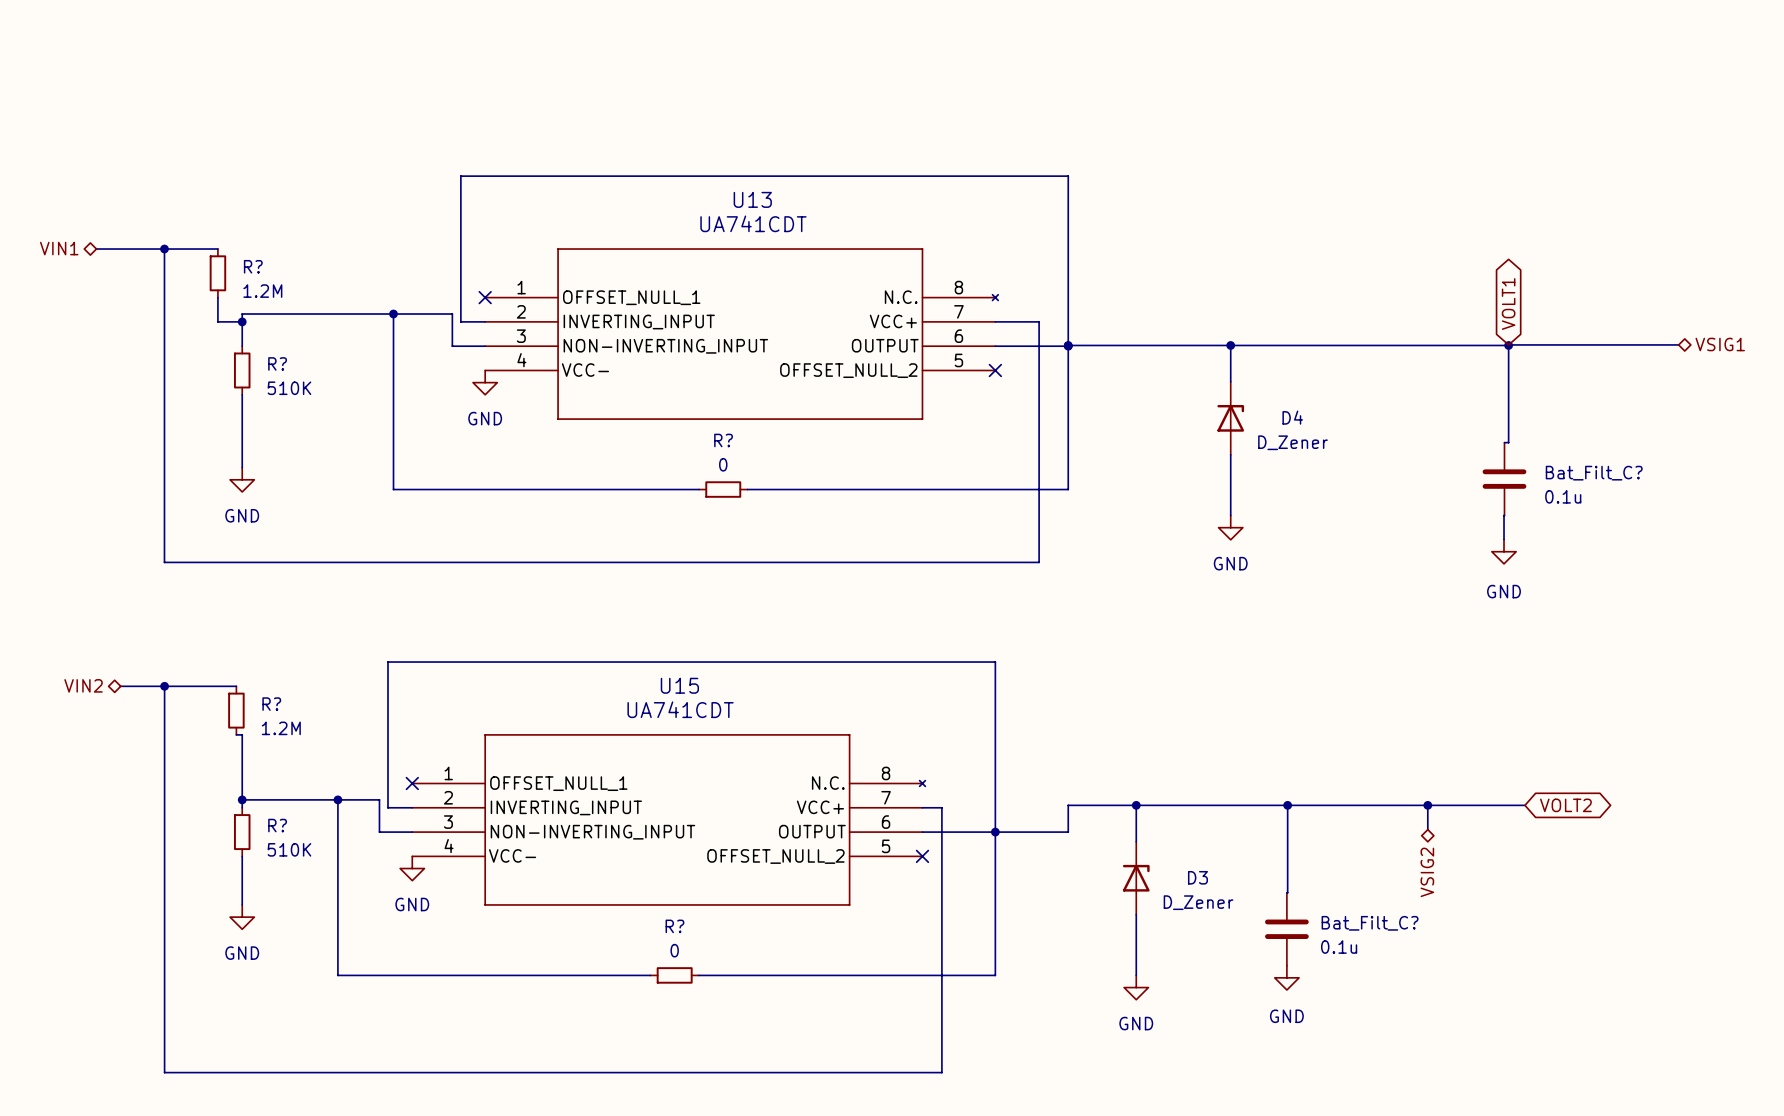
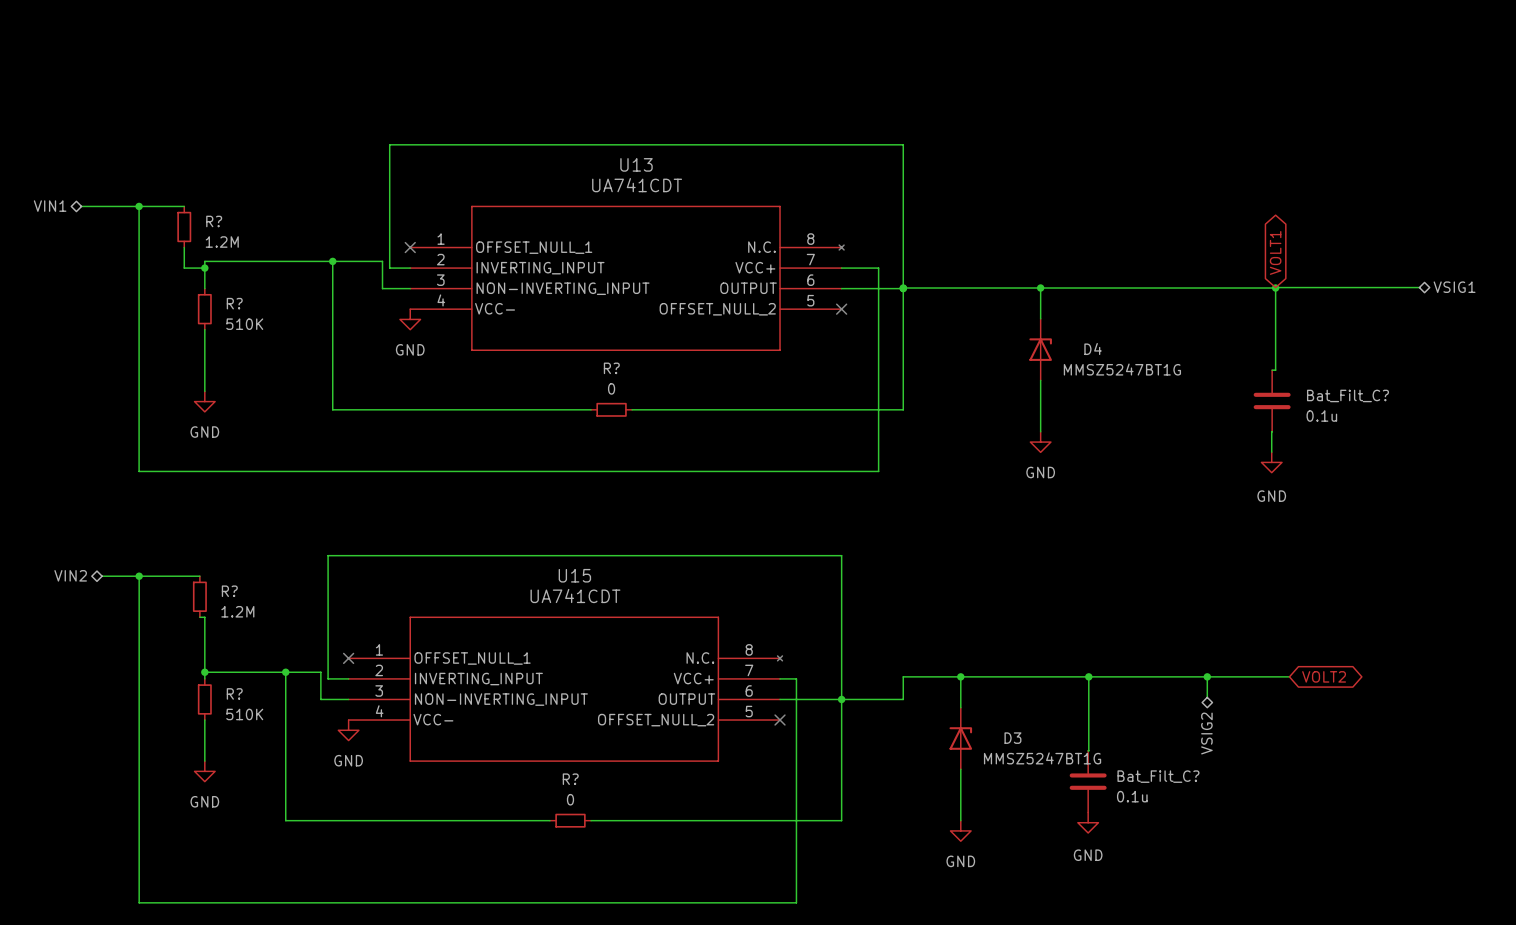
D4 value: D_Zener (1292, 442) -> MMSZ5247BT1G (1122, 369)
D3 value: D_Zener (1198, 902) -> MMSZ5247BT1G (1042, 758)

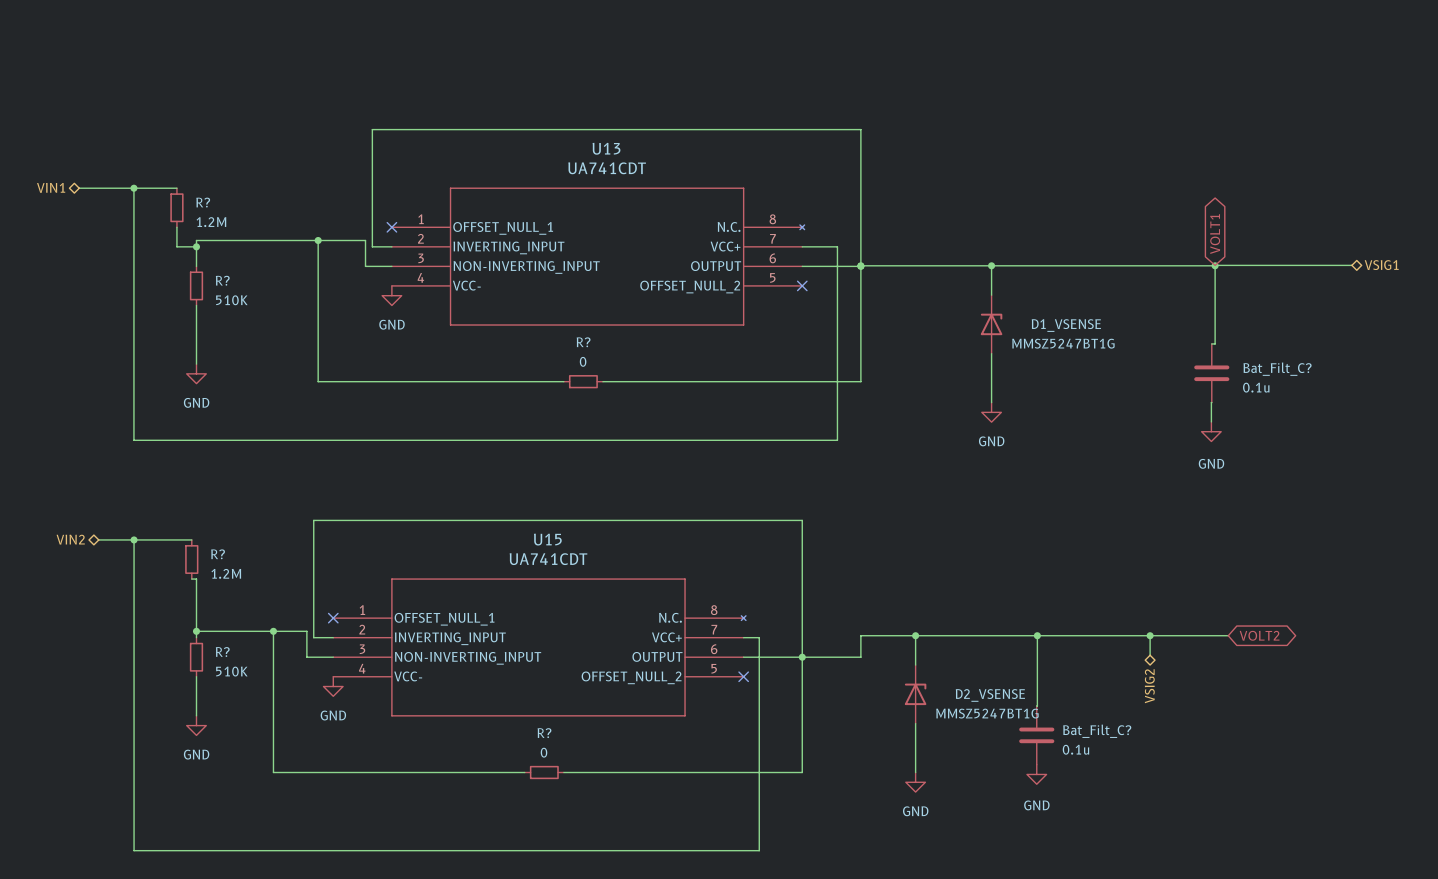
D4 name: D4 (1093, 349) -> D1_VSENSE (1066, 325)
D3 name: D3 (1012, 738) -> D2_VSENSE (990, 695)

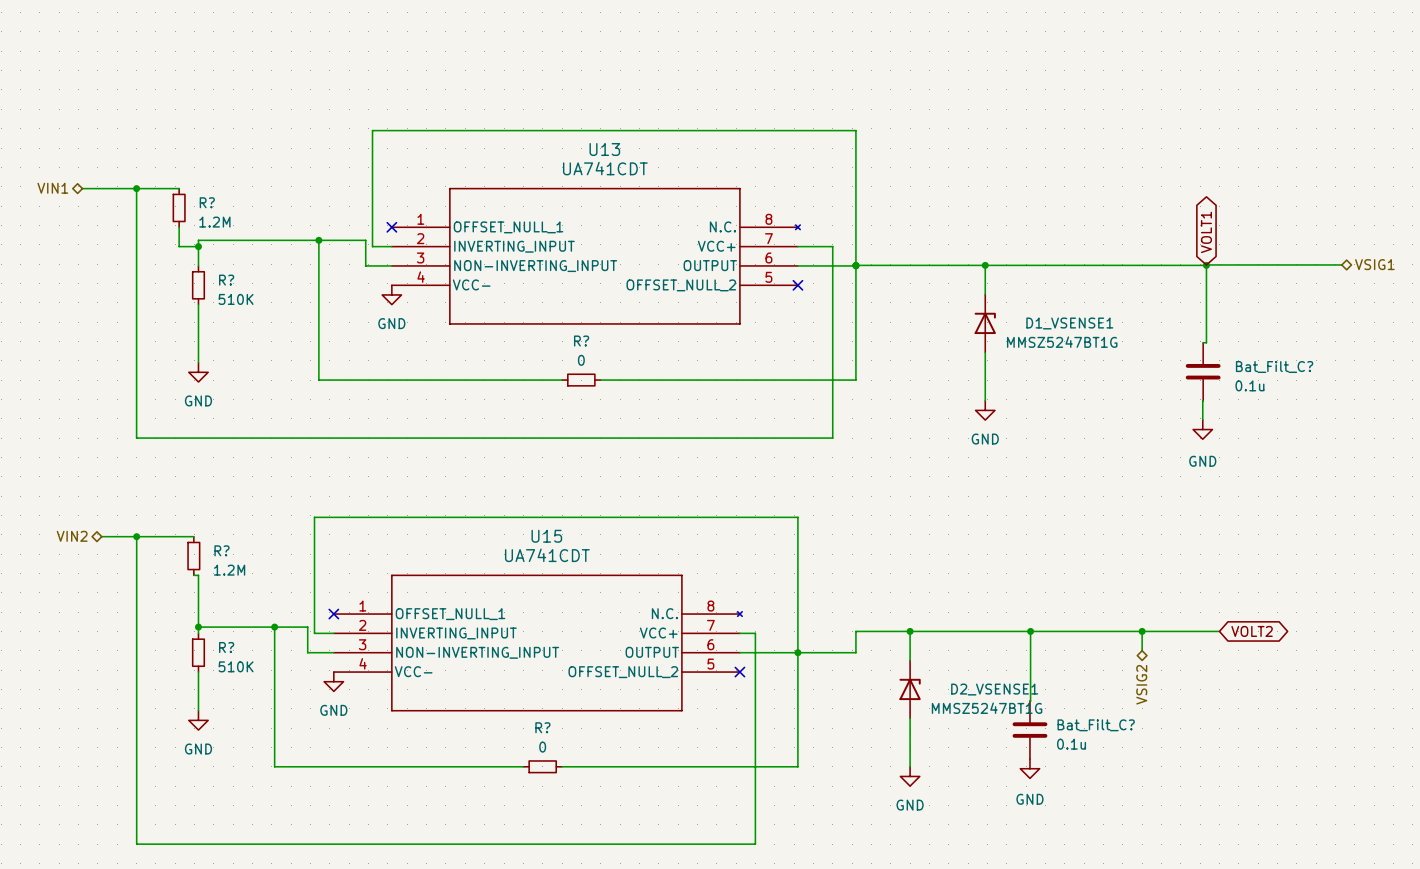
D1_VSENSE name: D1_VSENSE (1066, 325) -> D1_VSENSE1 (1069, 323)
D2_VSENSE name: D2_VSENSE (990, 695) -> D2_VSENSE1 (994, 689)

